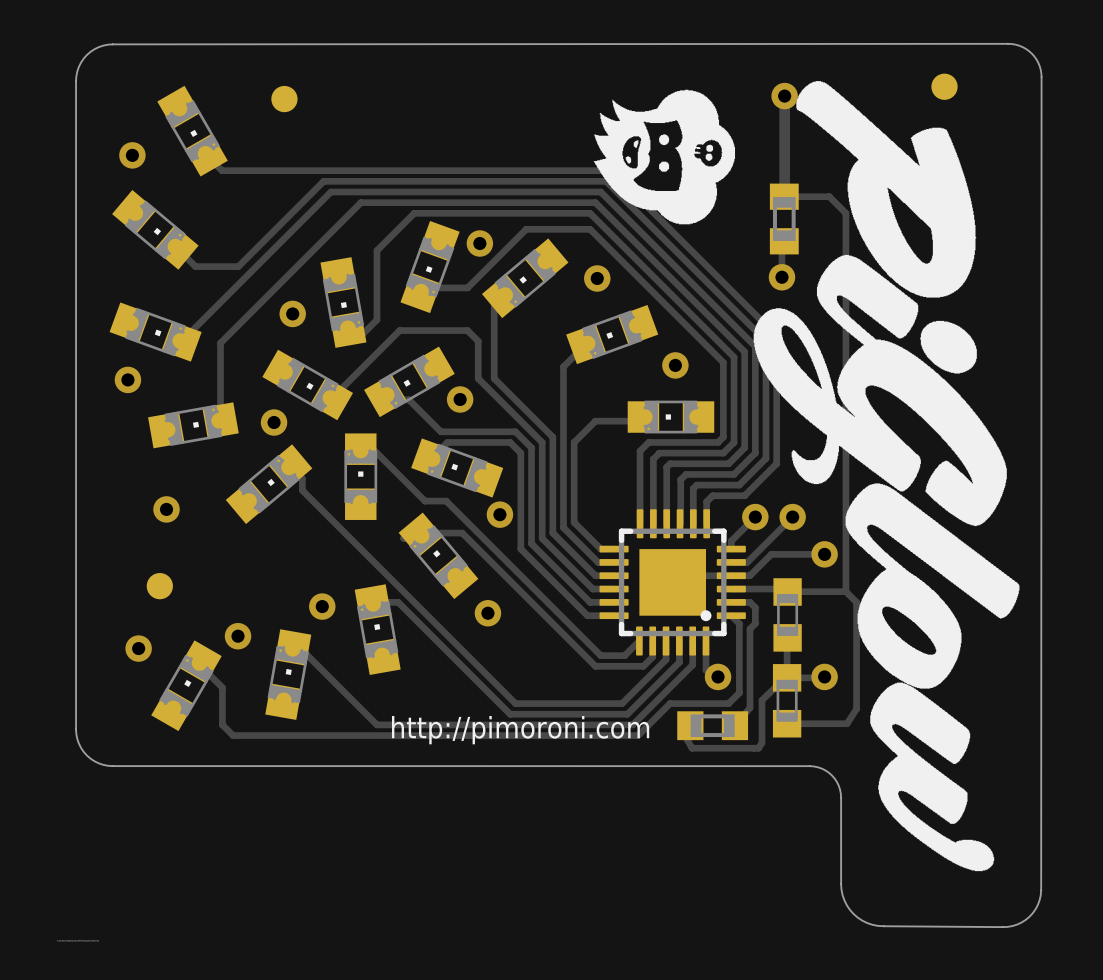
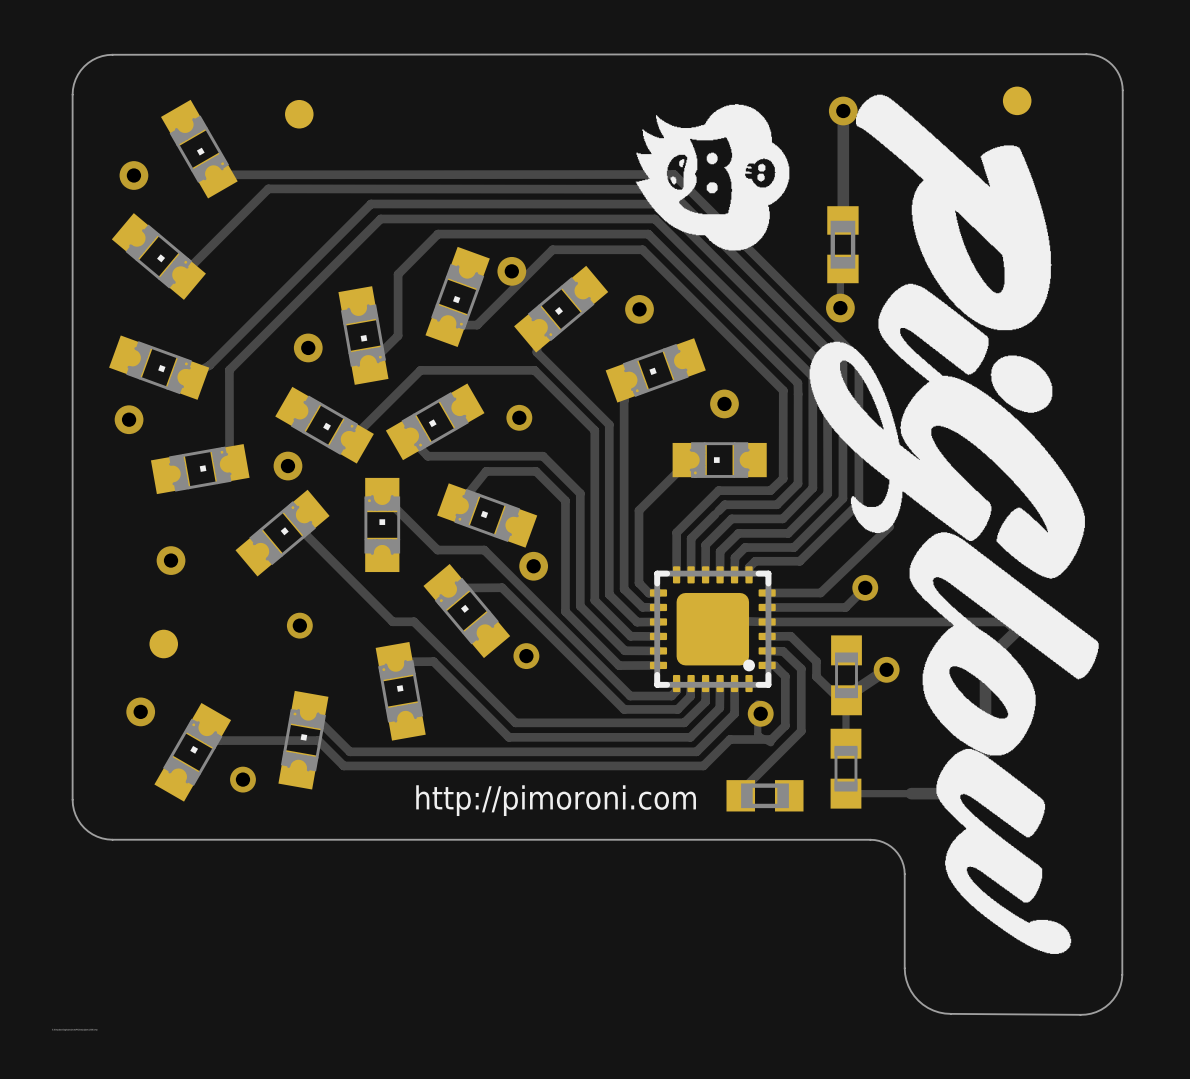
track: (206, 155) (222, 170) (611, 170) (776, 335) (776, 463) (744, 495) (712, 495) (706, 501) (706, 523) -> (214, 175) (209, 174) (673, 174) (858, 359) (858, 503) (799, 561) (755, 561) (749, 567) (749, 574)
track: (784, 196) (829, 196) (845, 213) (845, 591) -> none
track: (176, 247) (195, 266) (238, 266) (323, 181) (606, 181) (766, 341) (766, 458) (739, 485) (696, 485) (693, 488) (693, 523) -> (181, 275) (268, 188) (668, 189) (842, 364) (842, 498) (794, 547) (745, 547) (734, 557) (734, 574)
track: (420, 292) (425, 287) (467, 287) (526, 229) (590, 229) (723, 362) (723, 437) (718, 442) (648, 442) (640, 451) (640, 523) -> (447, 325) (477, 325) (552, 249) (642, 249) (783, 390) (783, 478) (770, 490) (718, 490) (676, 532) (676, 574)
track: (504, 295) (494, 305) (494, 378) (552, 437) (552, 533) (595, 575) (614, 575) -> (538, 328) (536, 352) (609, 424) (609, 594) (637, 622) (658, 621)
track: (348, 329) (354, 335) (360, 335) (376, 319) (376, 250) (414, 213) (590, 213) (734, 357) (734, 442) (723, 453) (659, 453) (653, 459) (653, 523) -> (368, 365) (398, 335) (398, 274) (438, 234) (648, 234) (797, 383) (798, 483) (777, 504) (724, 504) (718, 510)
track: (181, 341) (330, 192) (600, 192) (755, 346) (755, 453) (734, 474) (686, 474) (680, 479) (680, 523) -> (187, 377) (209, 365) (371, 203) (661, 204) (827, 370) (827, 493) (788, 533) (738, 533) (720, 551) (720, 574)
track: (586, 343) (563, 366) (563, 527) (598, 562) (614, 562) -> (627, 380) (624, 401) (624, 589) (642, 607) (658, 607)
via: none -> (519, 417)
track: (385, 395) (389, 399) (408, 399) (440, 431) (515, 431) (531, 447) (531, 543) (590, 602) (614, 602) -> (409, 436) (427, 456) (543, 456) (580, 493) (580, 606) (624, 650) (658, 650)
track: (331, 398) (399, 330) (467, 330) (478, 341) (478, 378) (542, 442) (542, 538) (592, 589) (614, 589) -> (350, 440) (420, 370) (534, 370) (594, 430) (594, 600) (630, 636) (658, 636)
via: (460, 399) -> none
track: (643, 417) (639, 421) (595, 421) (574, 442) (574, 522) (600, 549) (614, 549) -> (689, 460) (639, 510) (639, 583) (648, 593) (658, 592)
track: (220, 420) (220, 343) (360, 202) (595, 202) (744, 351) (744, 447) (728, 463) (670, 463) -> (229, 463) (229, 370) (380, 218) (654, 218) (812, 376) (812, 488) (782, 518) (731, 518) (705, 544) (705, 574)
track: (360, 449) (373, 449) (424, 501) (446, 501) (600, 655) (624, 655) (639, 641) -> (382, 495) (437, 550) (484, 550) (630, 696) (671, 696) (676, 690) (676, 683)
track: (431, 458) (447, 442) (510, 442) (520, 453) (520, 549) (587, 615) (614, 615) -> (459, 505) (486, 471) (536, 471) (565, 500) (565, 611) (619, 665) (658, 665)
track: (290, 466) (302, 478) (302, 490) (515, 703) (622, 703) (666, 659) (666, 641) -> (305, 513) (306, 534) (392, 621) (414, 621) (515, 722) (684, 722) (705, 701) (705, 683)
track: (666, 467) (666, 523) -> (715, 514) (691, 538) (691, 574)
track: none -> (889, 526) (820, 592) (767, 592)
part footprint: [599, 509, 746, 656] -> [649, 566, 776, 693]
track: (755, 517) (731, 541) (731, 549) -> none
via: (755, 517) -> none
track: (792, 517) (747, 562) (731, 562) -> none
via: (792, 517) -> none
track: (420, 534) (417, 538) (403, 538) (408, 533) (462, 533) (595, 666) (643, 666) (652, 657) (652, 641) -> (447, 588) (502, 587) (624, 709) (677, 709) (690, 696) (691, 683)
track: none -> (865, 587) (845, 607) (767, 607)
via: none -> (865, 587)
track: (824, 554) (771, 554) (749, 575) (679, 575) (672, 582) -> none
via: (824, 554) -> none
via: none -> (299, 625)
track: none -> (767, 636) (790, 636) (816, 661) (816, 676) (840, 700) (886, 669)
track: (731, 589) (779, 589) (787, 591) (782, 591) (845, 591) -> none
track: (845, 591) (856, 602) (856, 708) (847, 723) -> (712, 629) (734, 621) (1006, 621) (1016, 631) (985, 661) (985, 752) (944, 793) (911, 793)
track: none -> (767, 650) (783, 651) (801, 668) (801, 731) (740, 793)
track: (373, 602) (398, 602) (510, 714) (627, 714) (679, 662) (679, 641) -> (395, 661) (433, 661) (508, 737) (690, 737) (719, 707) (720, 683)
track: (731, 602) (750, 602) (755, 607) (755, 623) (750, 628) (750, 707) (734, 725) -> none
via: (322, 606) -> none
via: none -> (886, 669)
via position: (487, 613) -> (526, 656)
track: (731, 615) (739, 623) (739, 692) (728, 703) (670, 703) (638, 735) (233, 735) (222, 724) (222, 687) (200, 665) (200, 661) -> (767, 665) (774, 665) (785, 676) (785, 725) (771, 739) (729, 739) (703, 765) (343, 765) (318, 740) (219, 740) (207, 726)
via: (238, 636) -> none
track: (692, 641) (692, 664) (632, 724) (376, 724) (299, 647) (293, 647) -> (734, 683) (734, 713) (696, 751) (349, 751) (308, 710)
via: none -> (760, 713)
via: (718, 676) -> none
track: (824, 676) (786, 676) (762, 700) (762, 742) (758, 748) (692, 748) (687, 740) (687, 724) (690, 725) -> none
via: (824, 676) -> none
via: none -> (242, 779)

